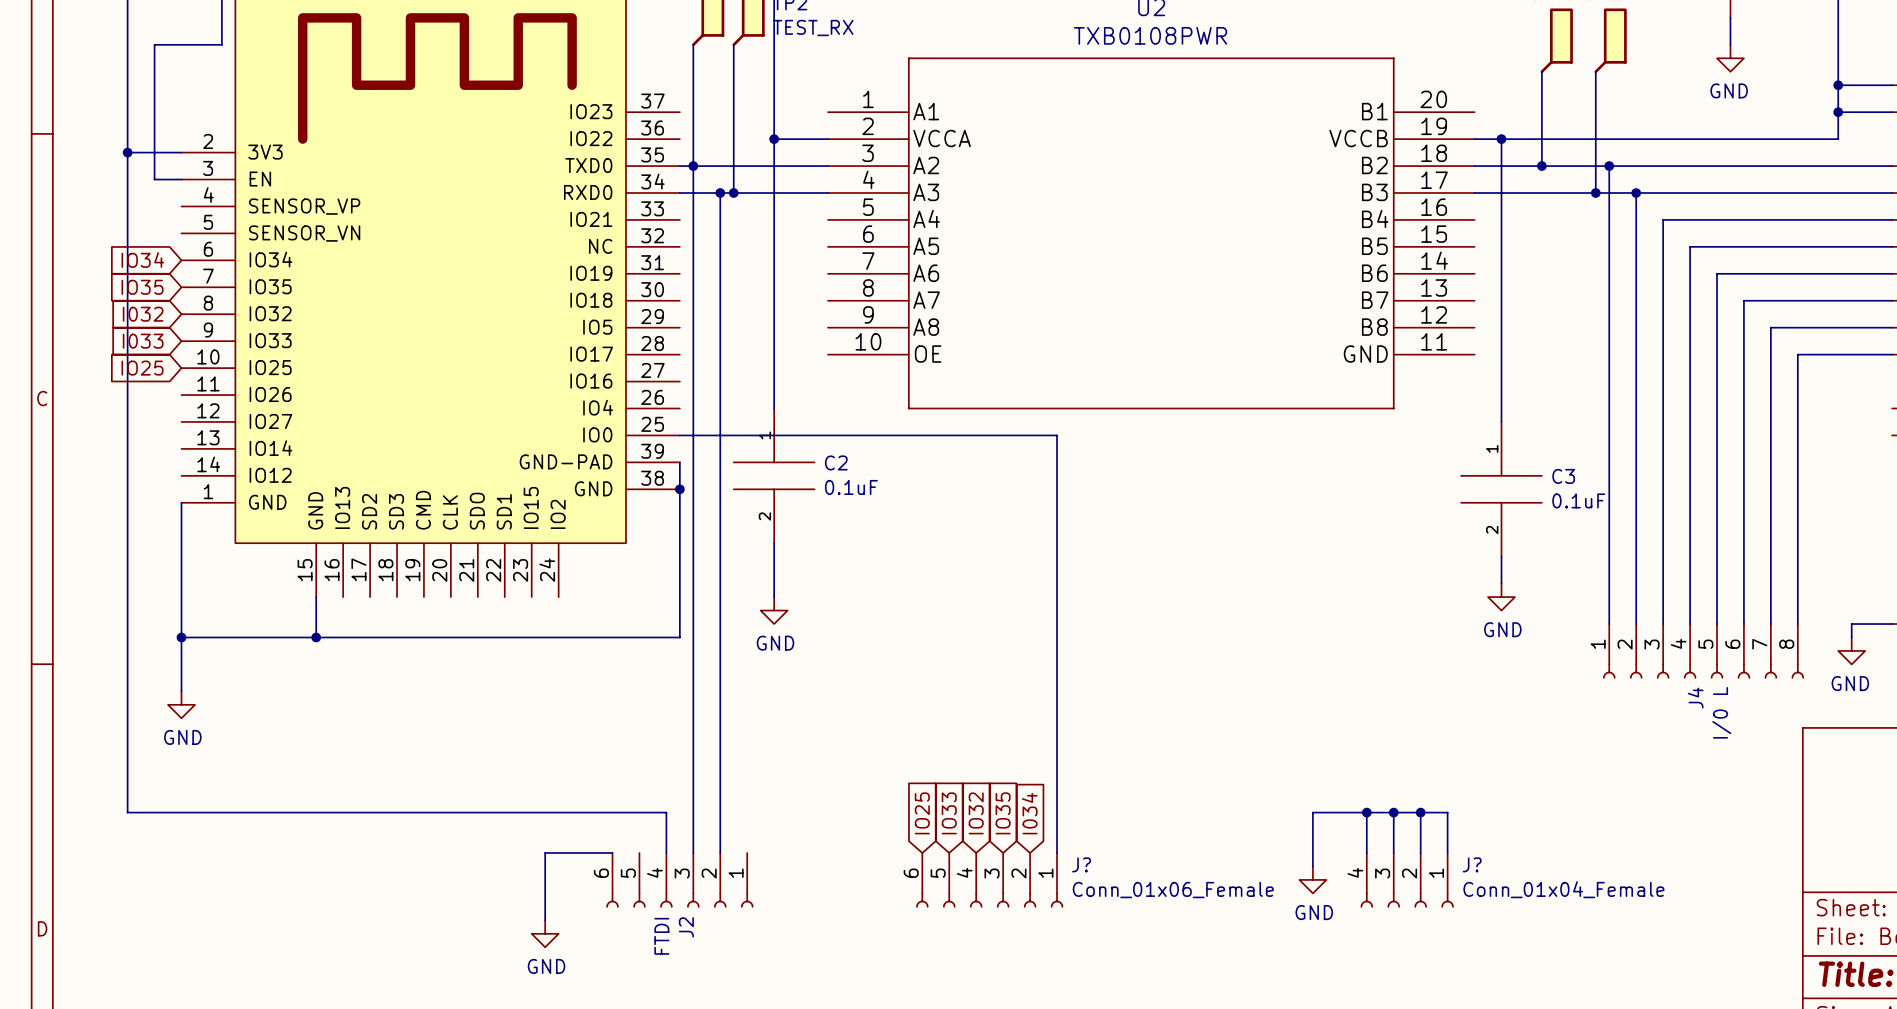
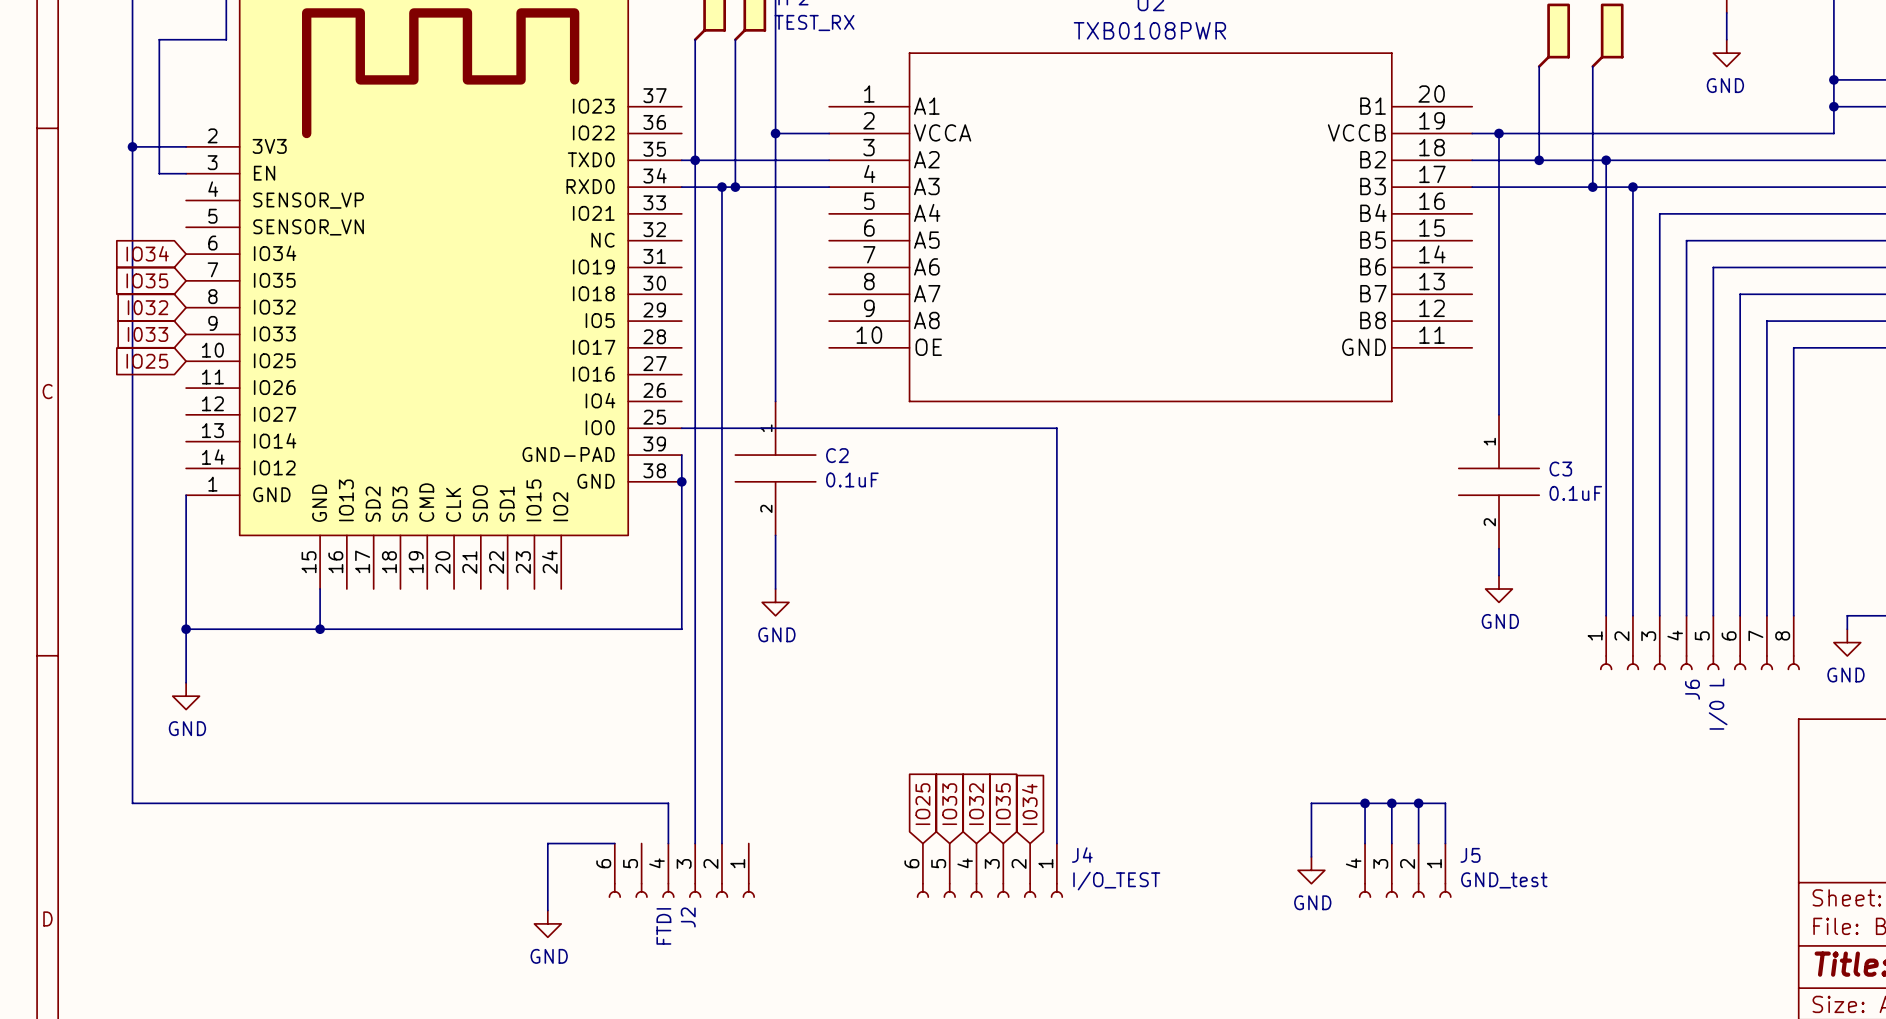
J4 name: J4 (1695, 698) -> J6 (1692, 689)
J? name: J? (1081, 864) -> J4 (1082, 855)
J? name: J? (1472, 864) -> J5 (1470, 855)
J? value: Conn_01x04_Female (1563, 889) -> GND_test (1504, 880)
J? value: Conn_01x06_Female (1173, 890) -> I/O_TEST (1116, 881)

